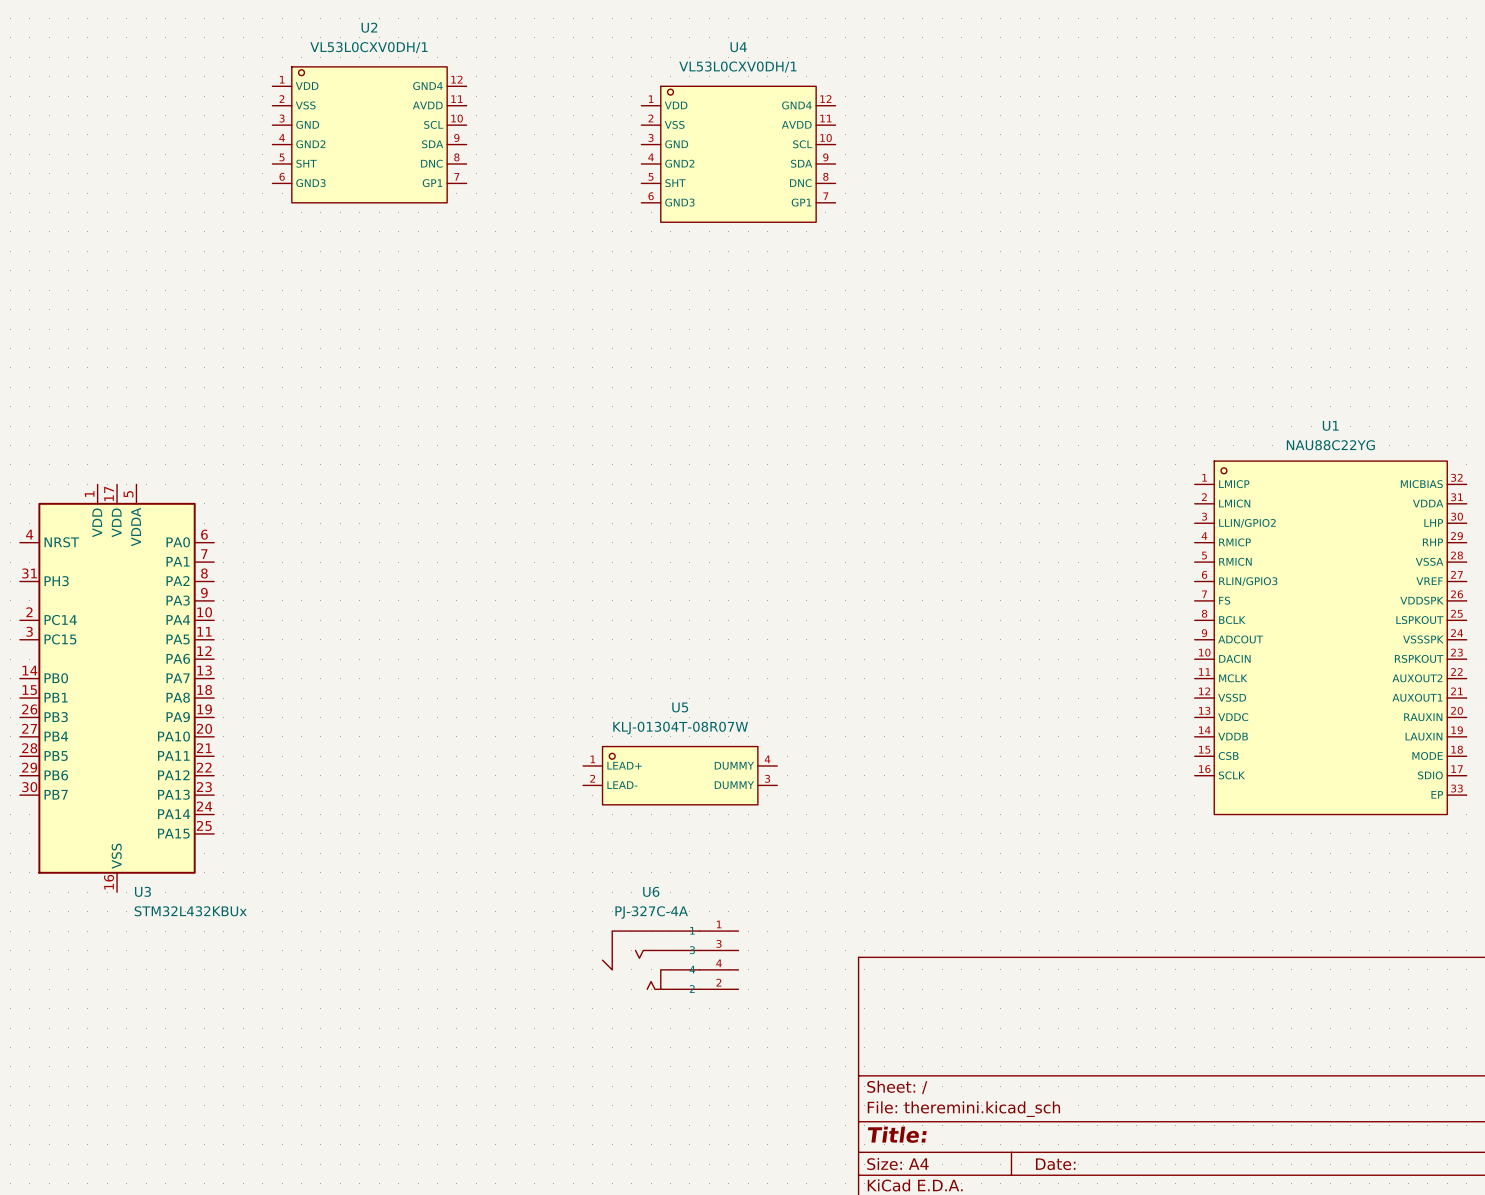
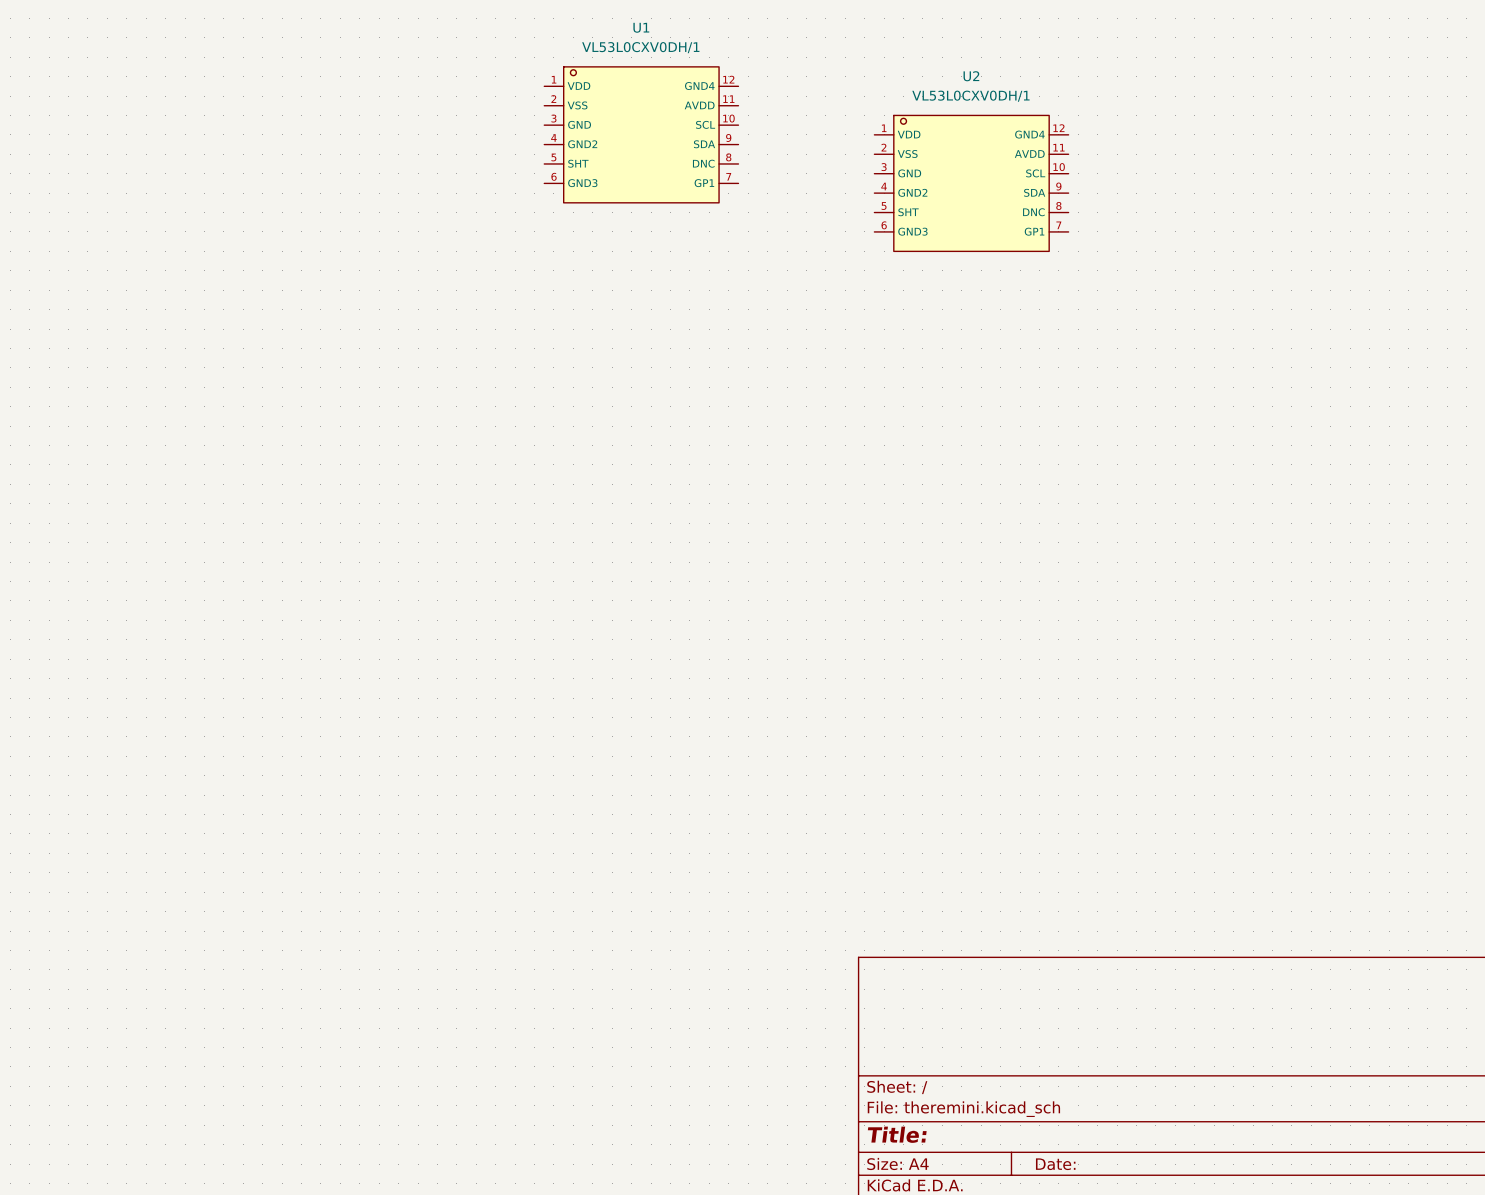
U2 position: (369, 134) -> (971, 183)
U4: VL53L0CXV0DH/1 (738, 154) -> none
U1 name position: U1 (1330, 425) -> U1 (641, 27)
U1 value: NAU88C22YG (1330, 445) -> VL53L0CXV0DH/1 (640, 47)
U1 symbol: [1194, 461, 1467, 815] -> [544, 66, 739, 203]
U3: STM32L432KBUx (117, 688) -> none
U5: KLJ-01304T-08R07W (680, 775) -> none
U6: PJ-327C-4A (670, 960) -> none

